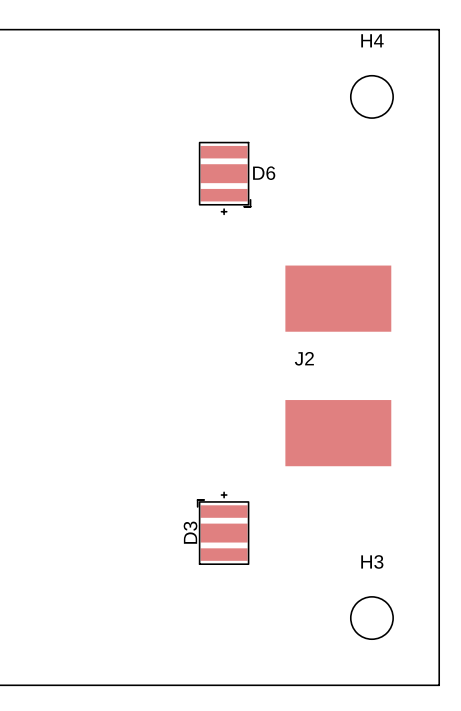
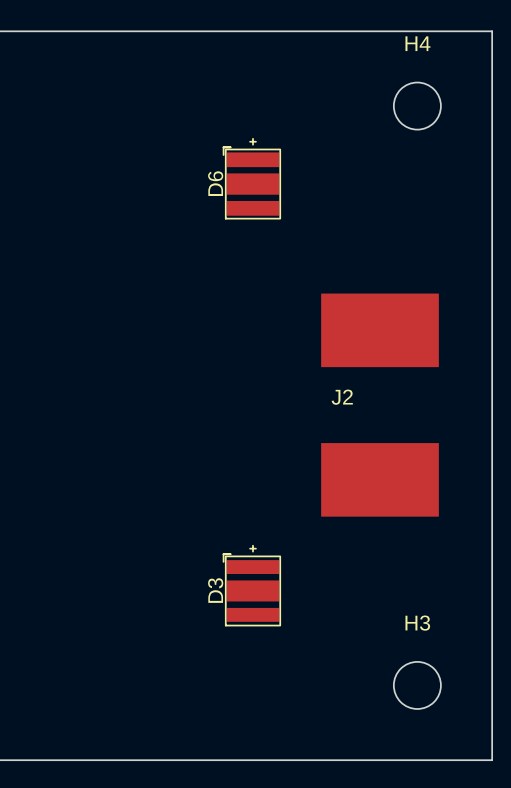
D6 footprint: [198, 141, 252, 216] -> [222, 138, 281, 220]
D6 name position: D6 (264, 173) -> D6 (215, 183)

